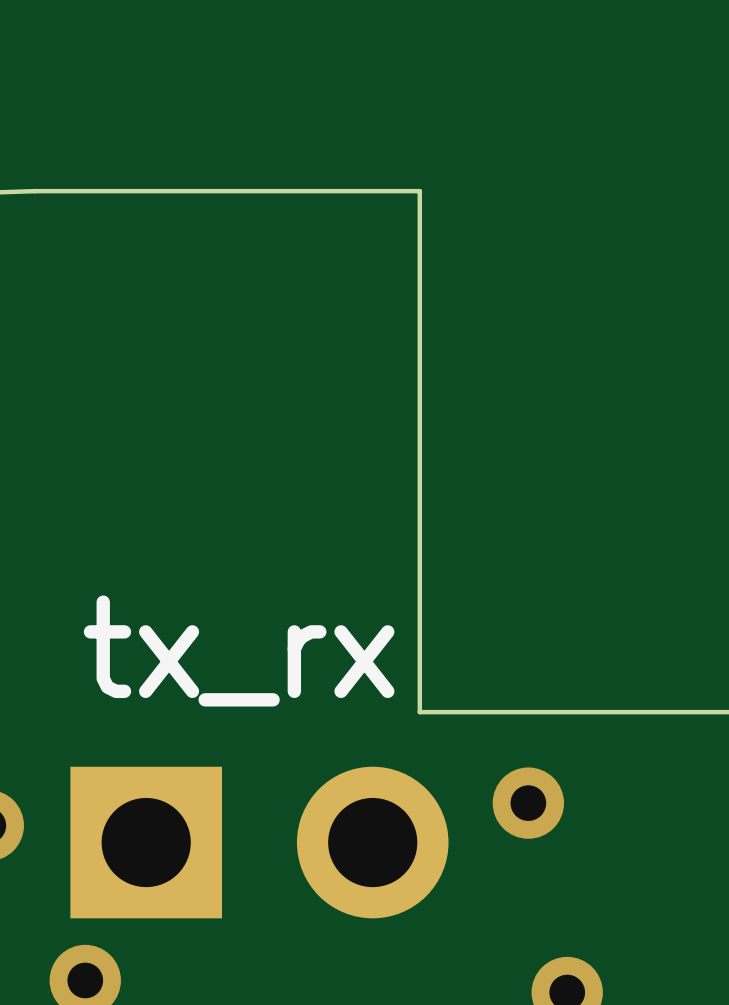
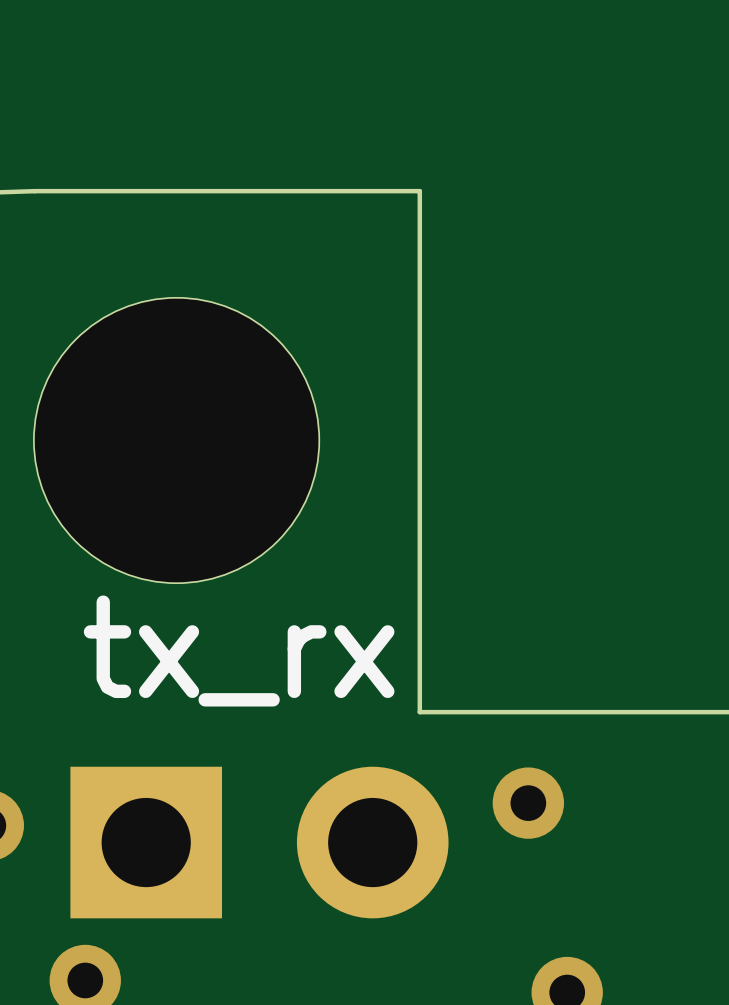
part: none -> (176, 440)

